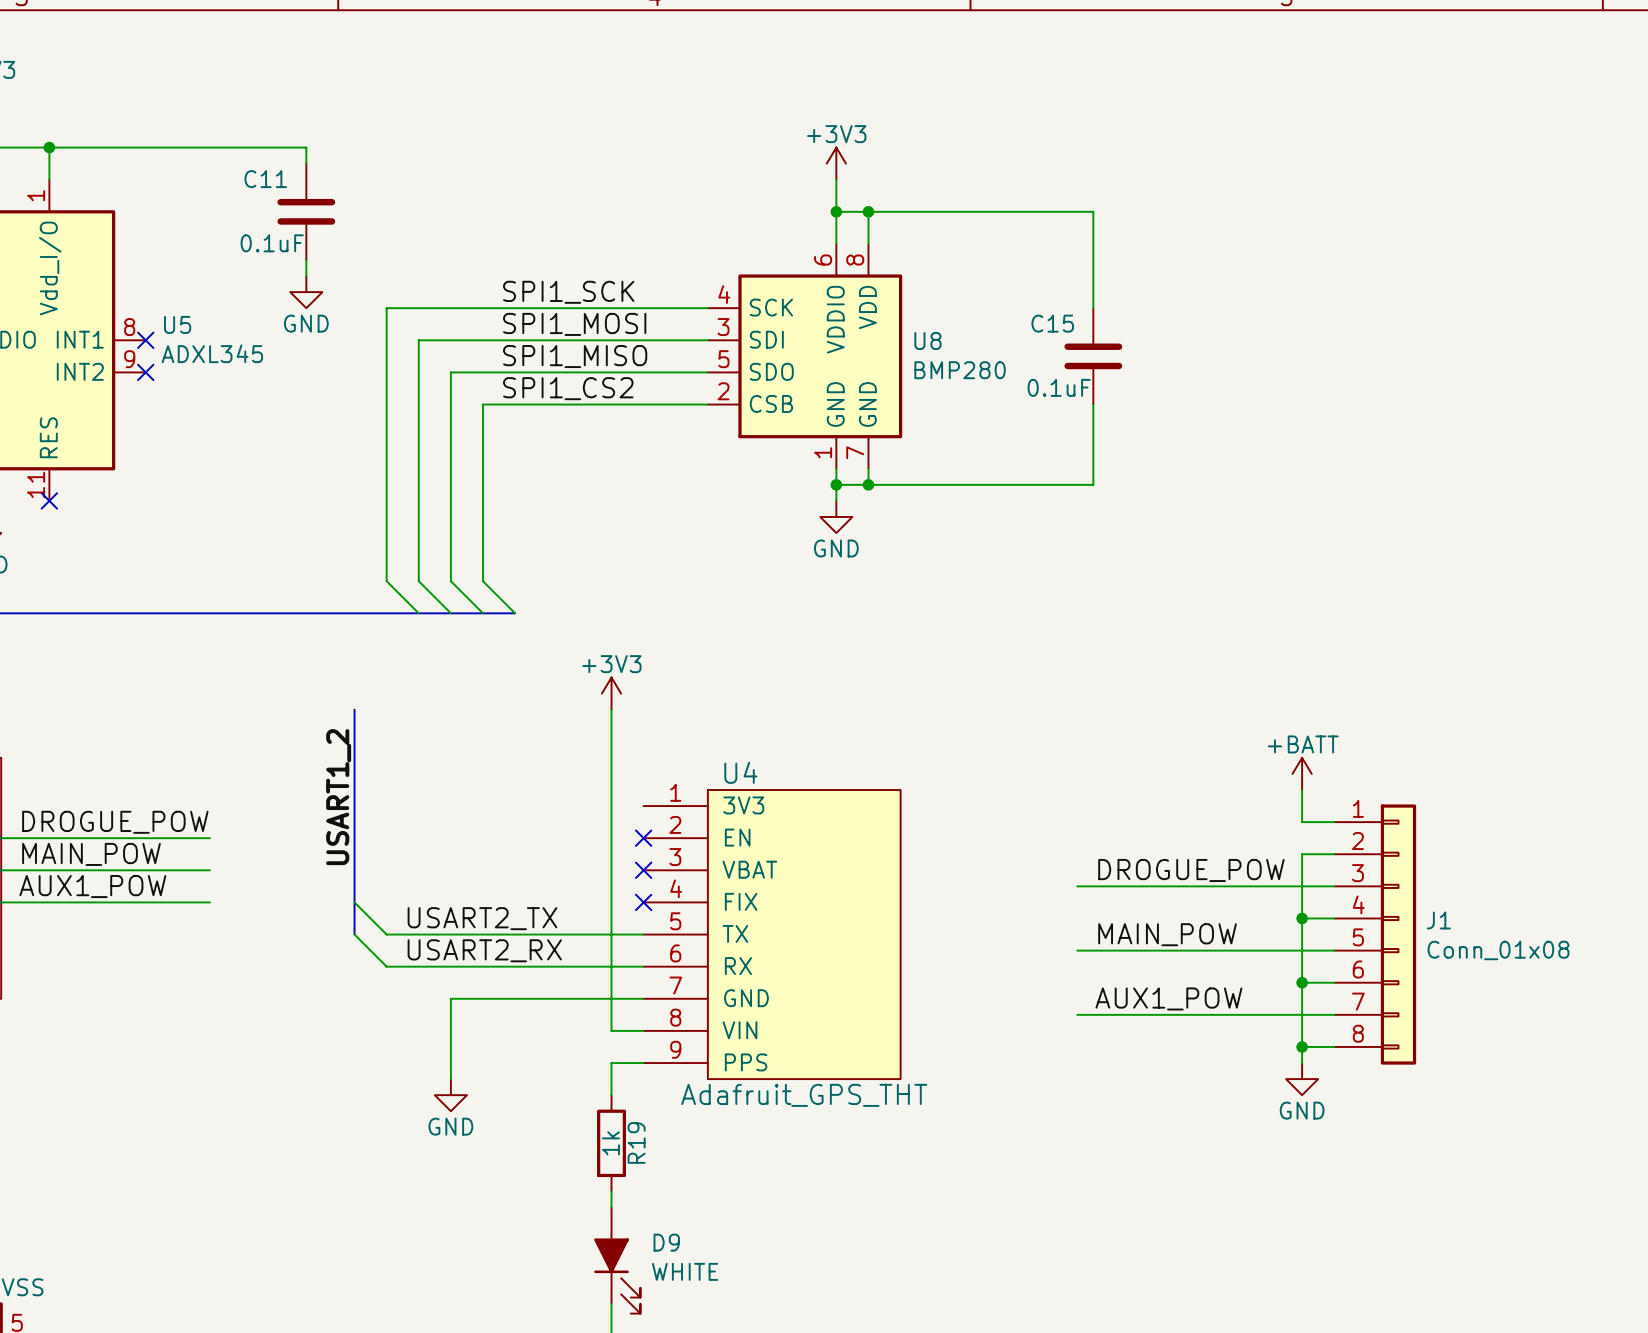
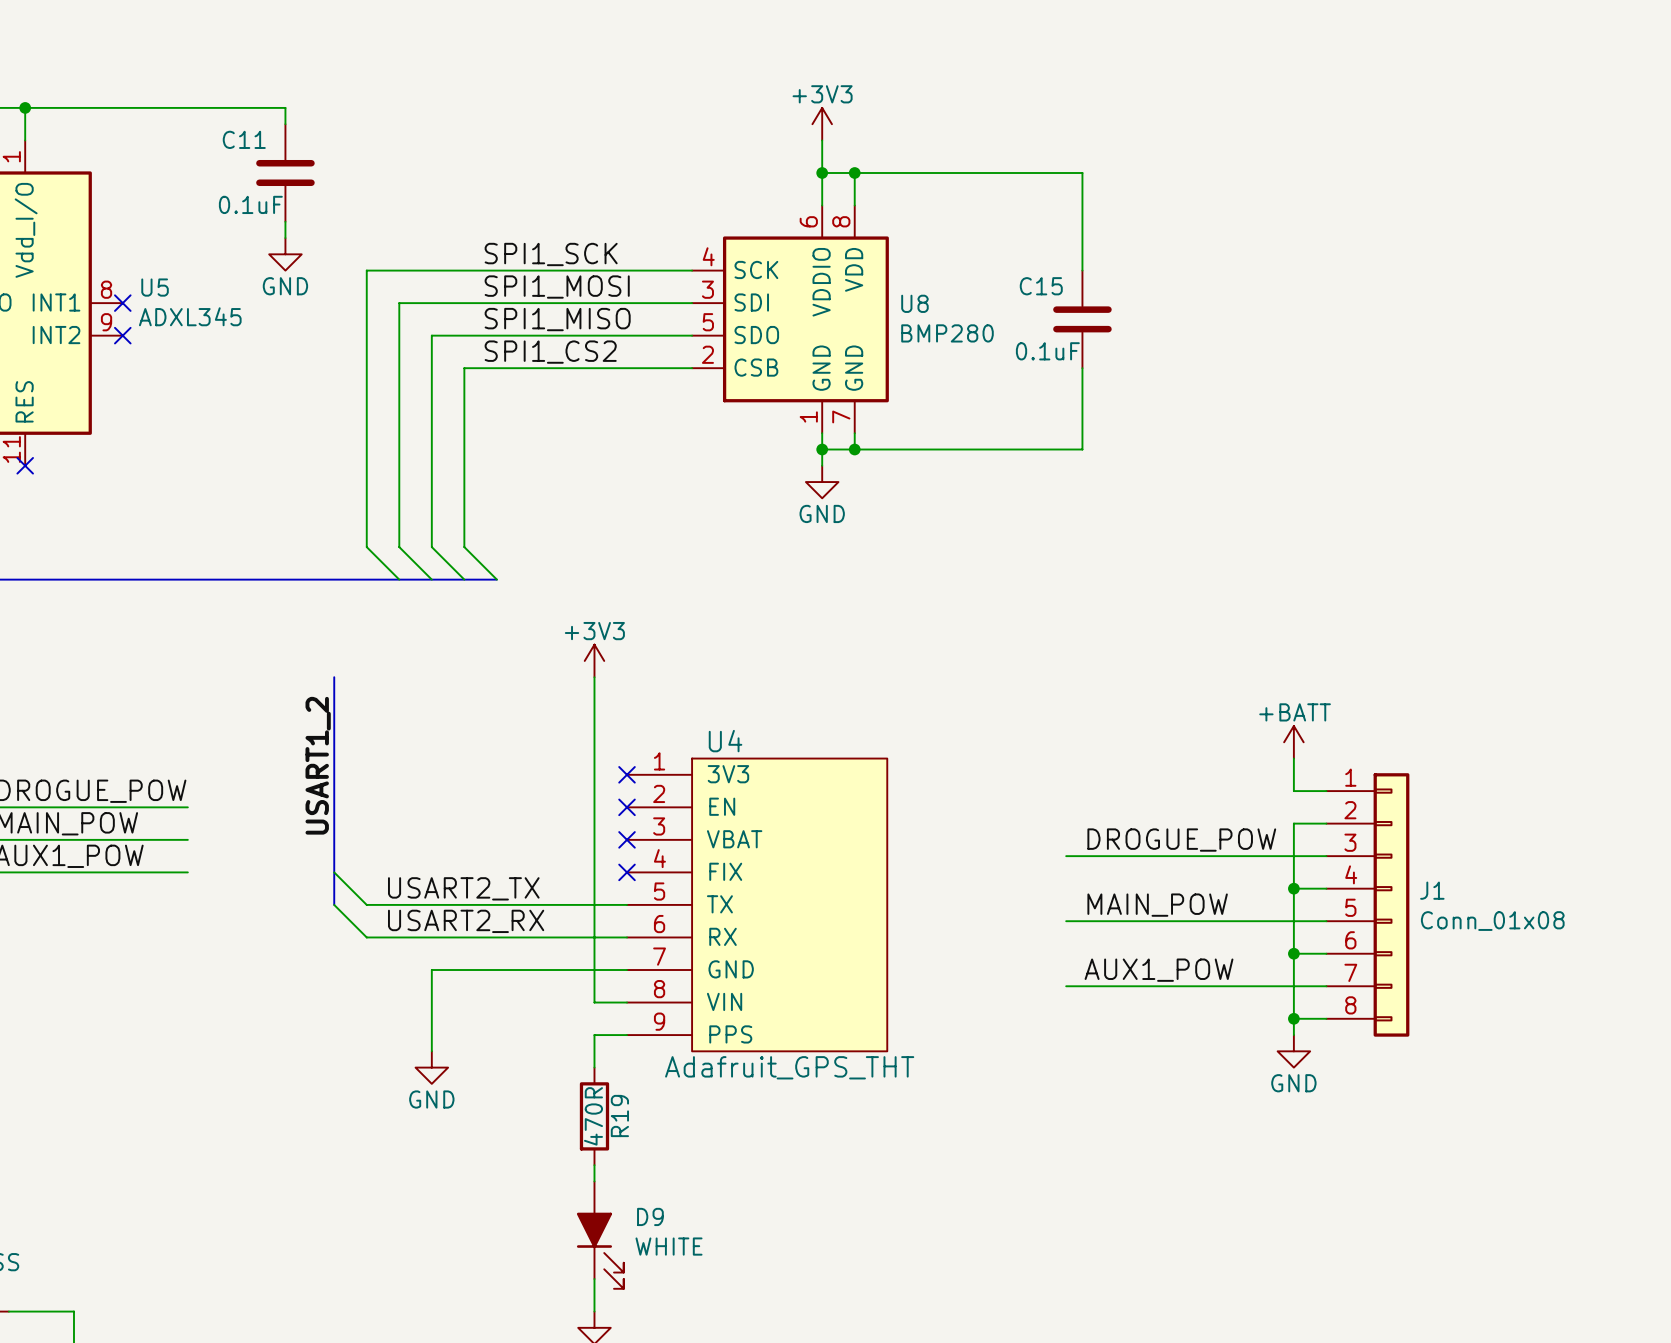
no-connect mark: none -> (627, 774)
R19 value: 1k (610, 1143) -> 470R (593, 1116)

